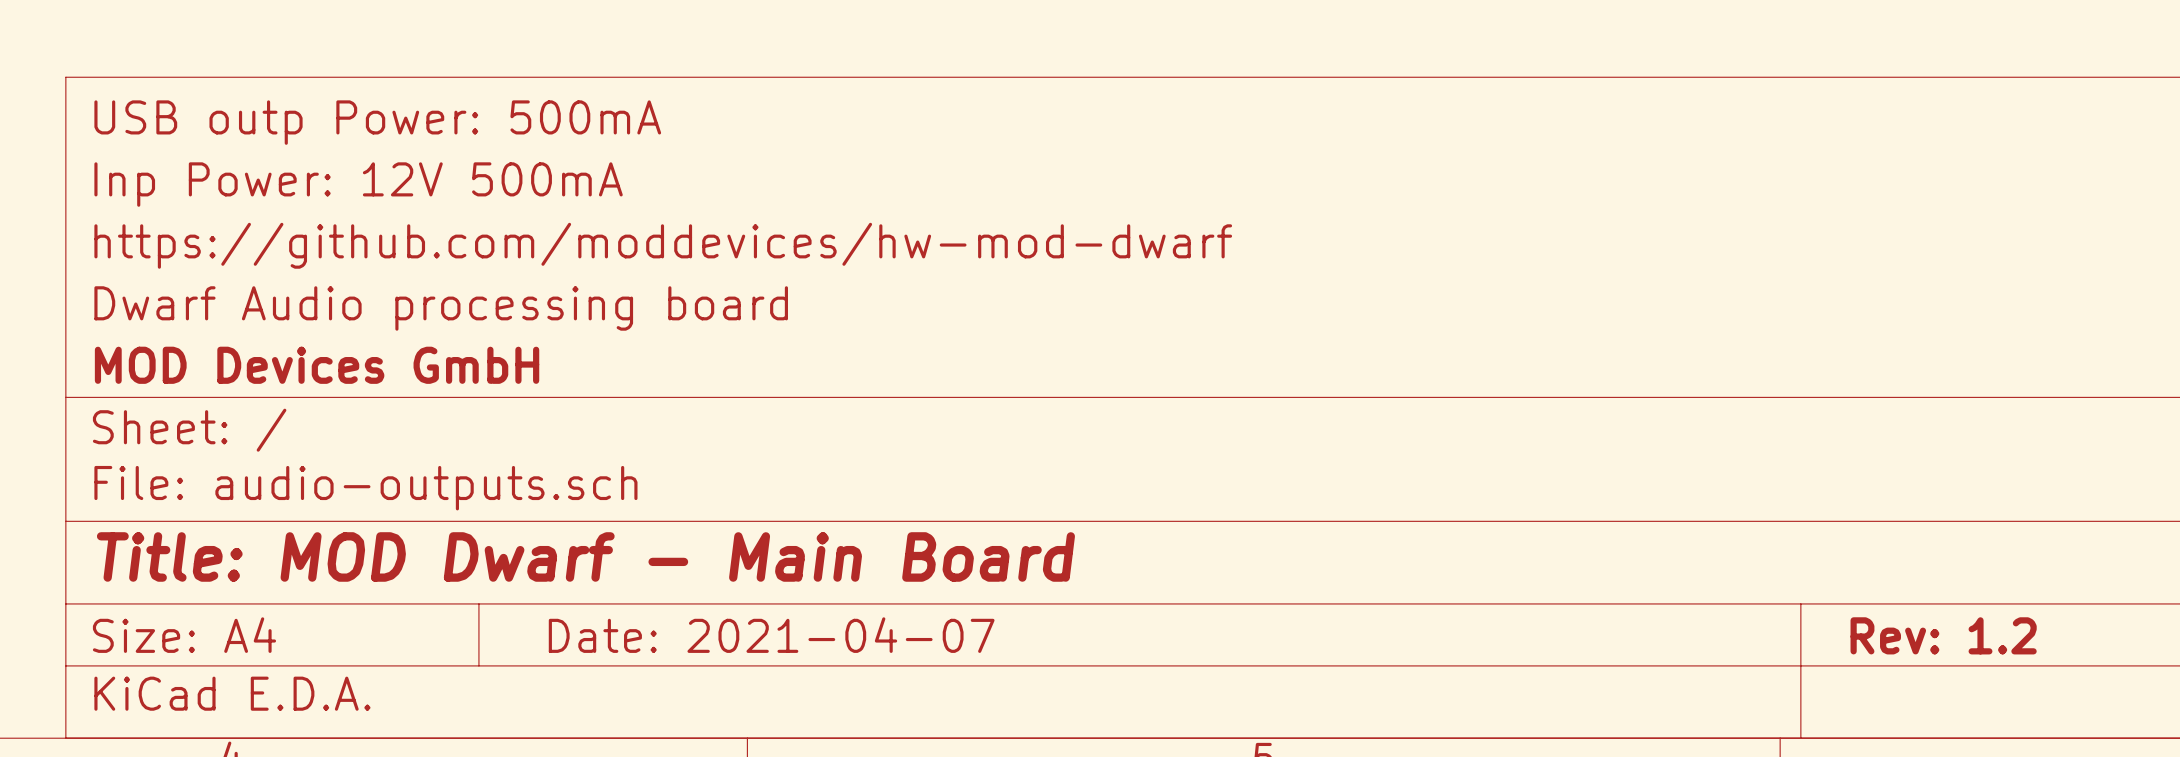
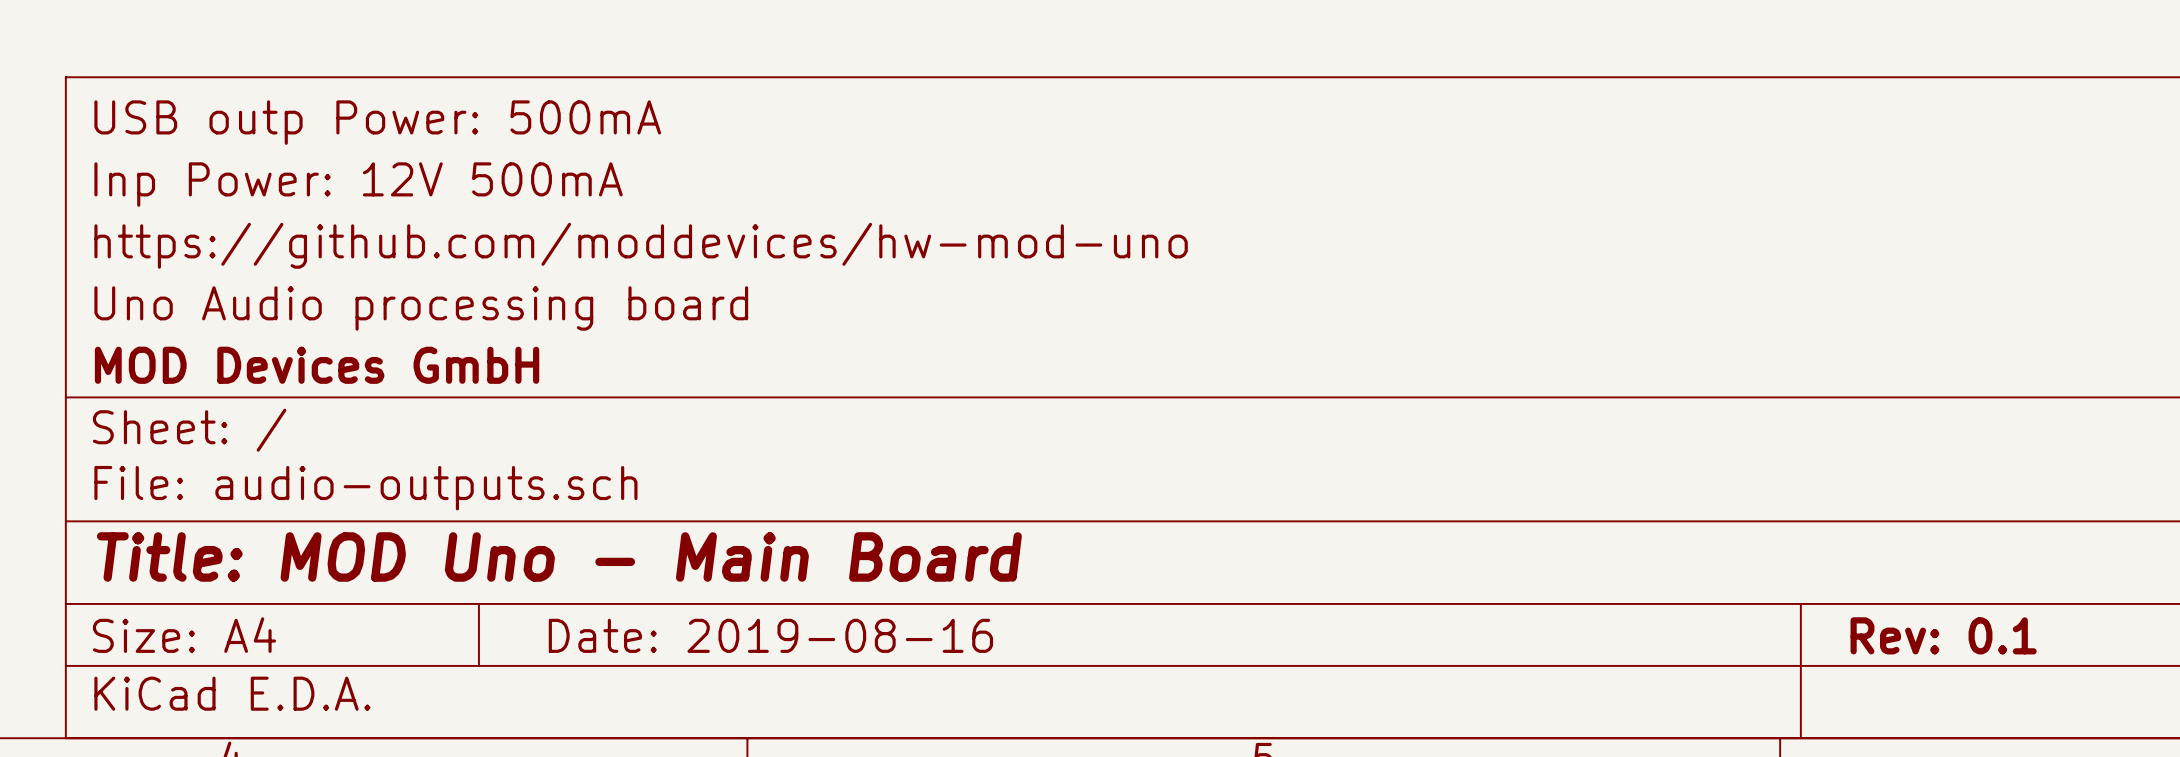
title block: https://github.com/moddevices/hw-mod-dwarf (663, 245) -> https://github.com/moddevices/hw-mod-uno (641, 245)
title block: Dwarf Audio processing board (441, 308) -> Uno Audio processing board (421, 308)
title block: Title: MOD Dwarf - Main Board (585, 556) -> Title: MOD Uno - Main Board (559, 556)
title block: Date: 2021-04-07 (771, 635) -> Date: 2019-08-16 (770, 635)
title block: Rev: 1.2 (1943, 635) -> Rev: 0.1 (1943, 635)

